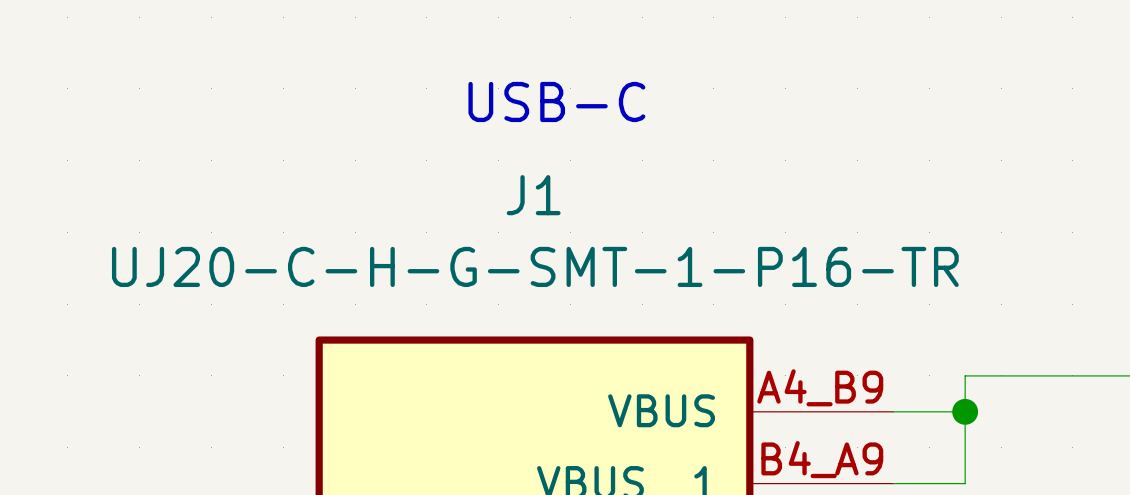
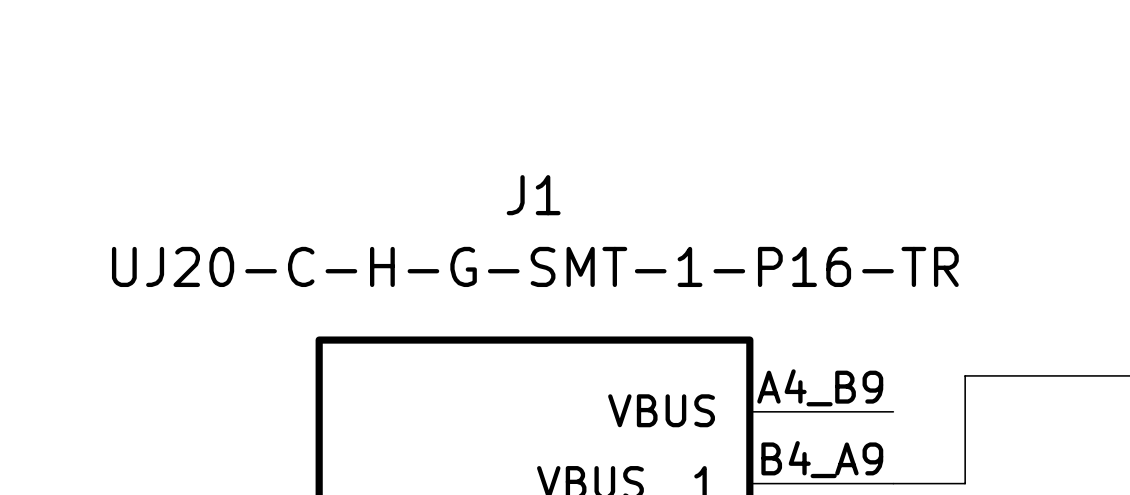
text: USB-C (556, 101) -> none
wire: (893, 411) (965, 411) -> none
junction: (965, 411) -> none

